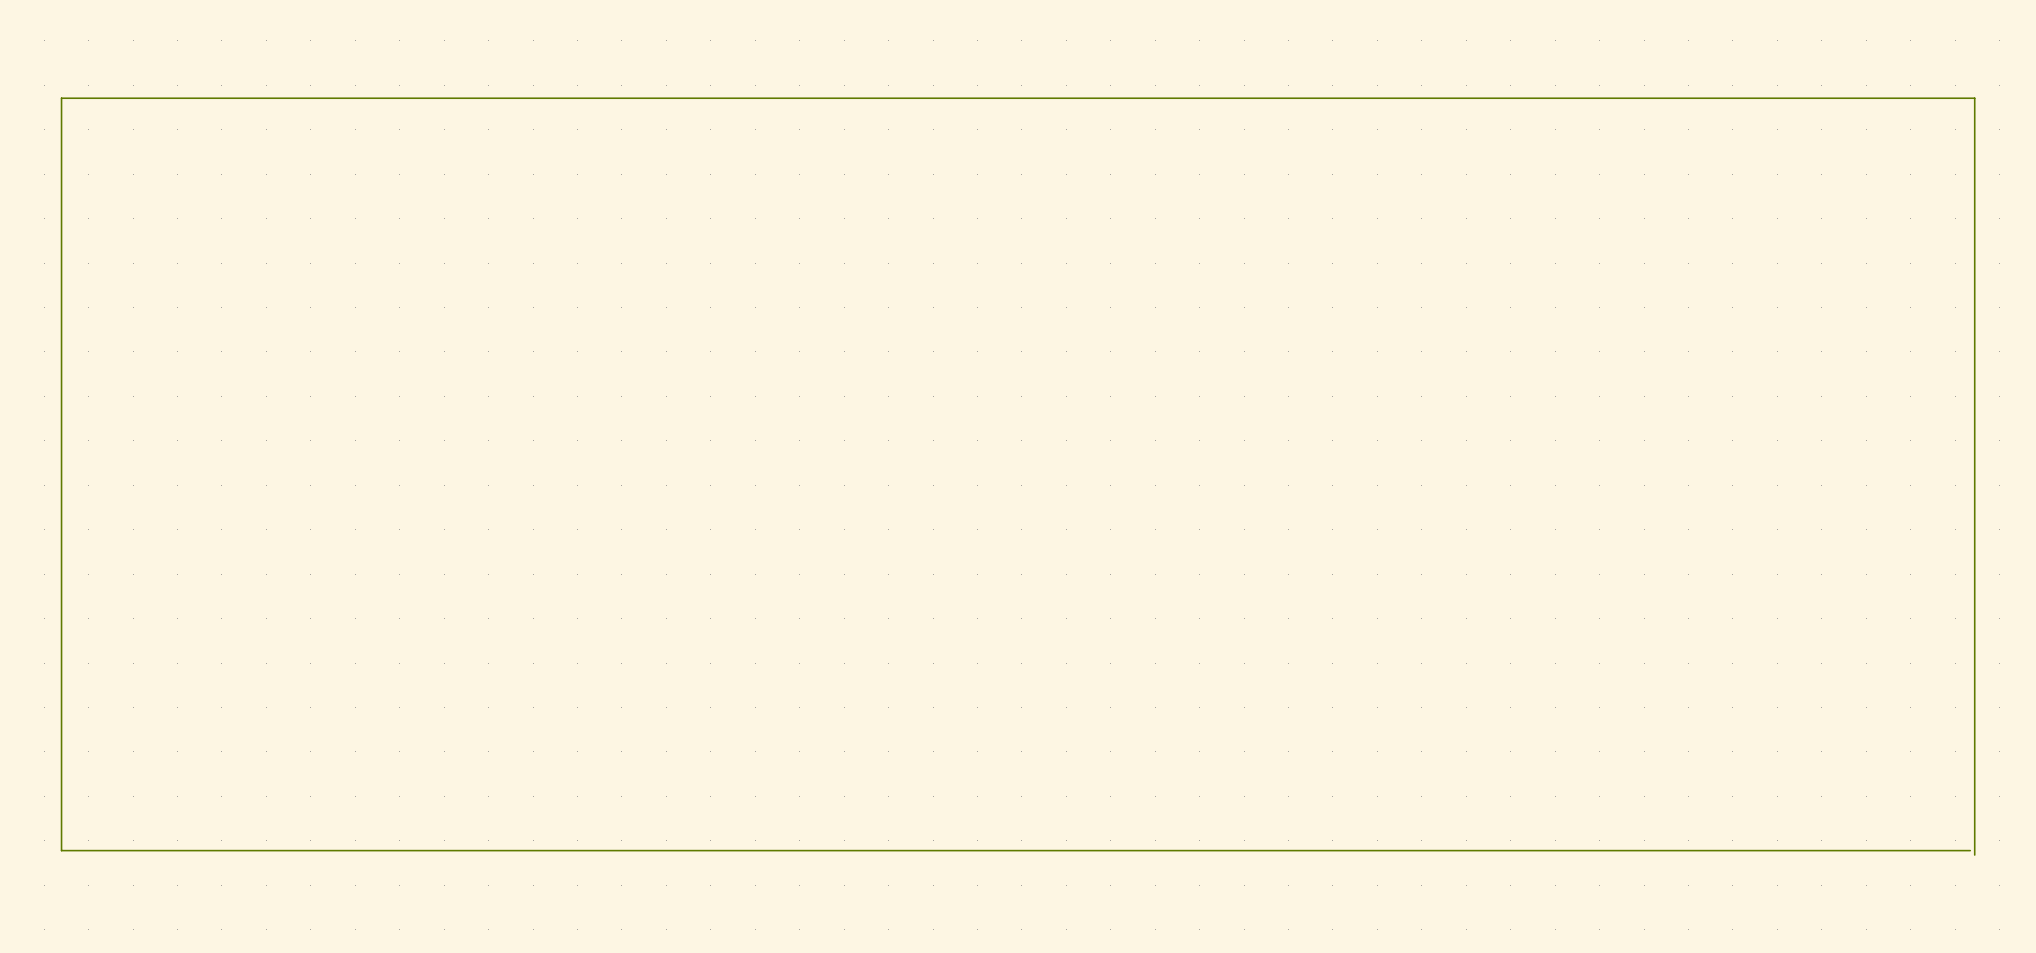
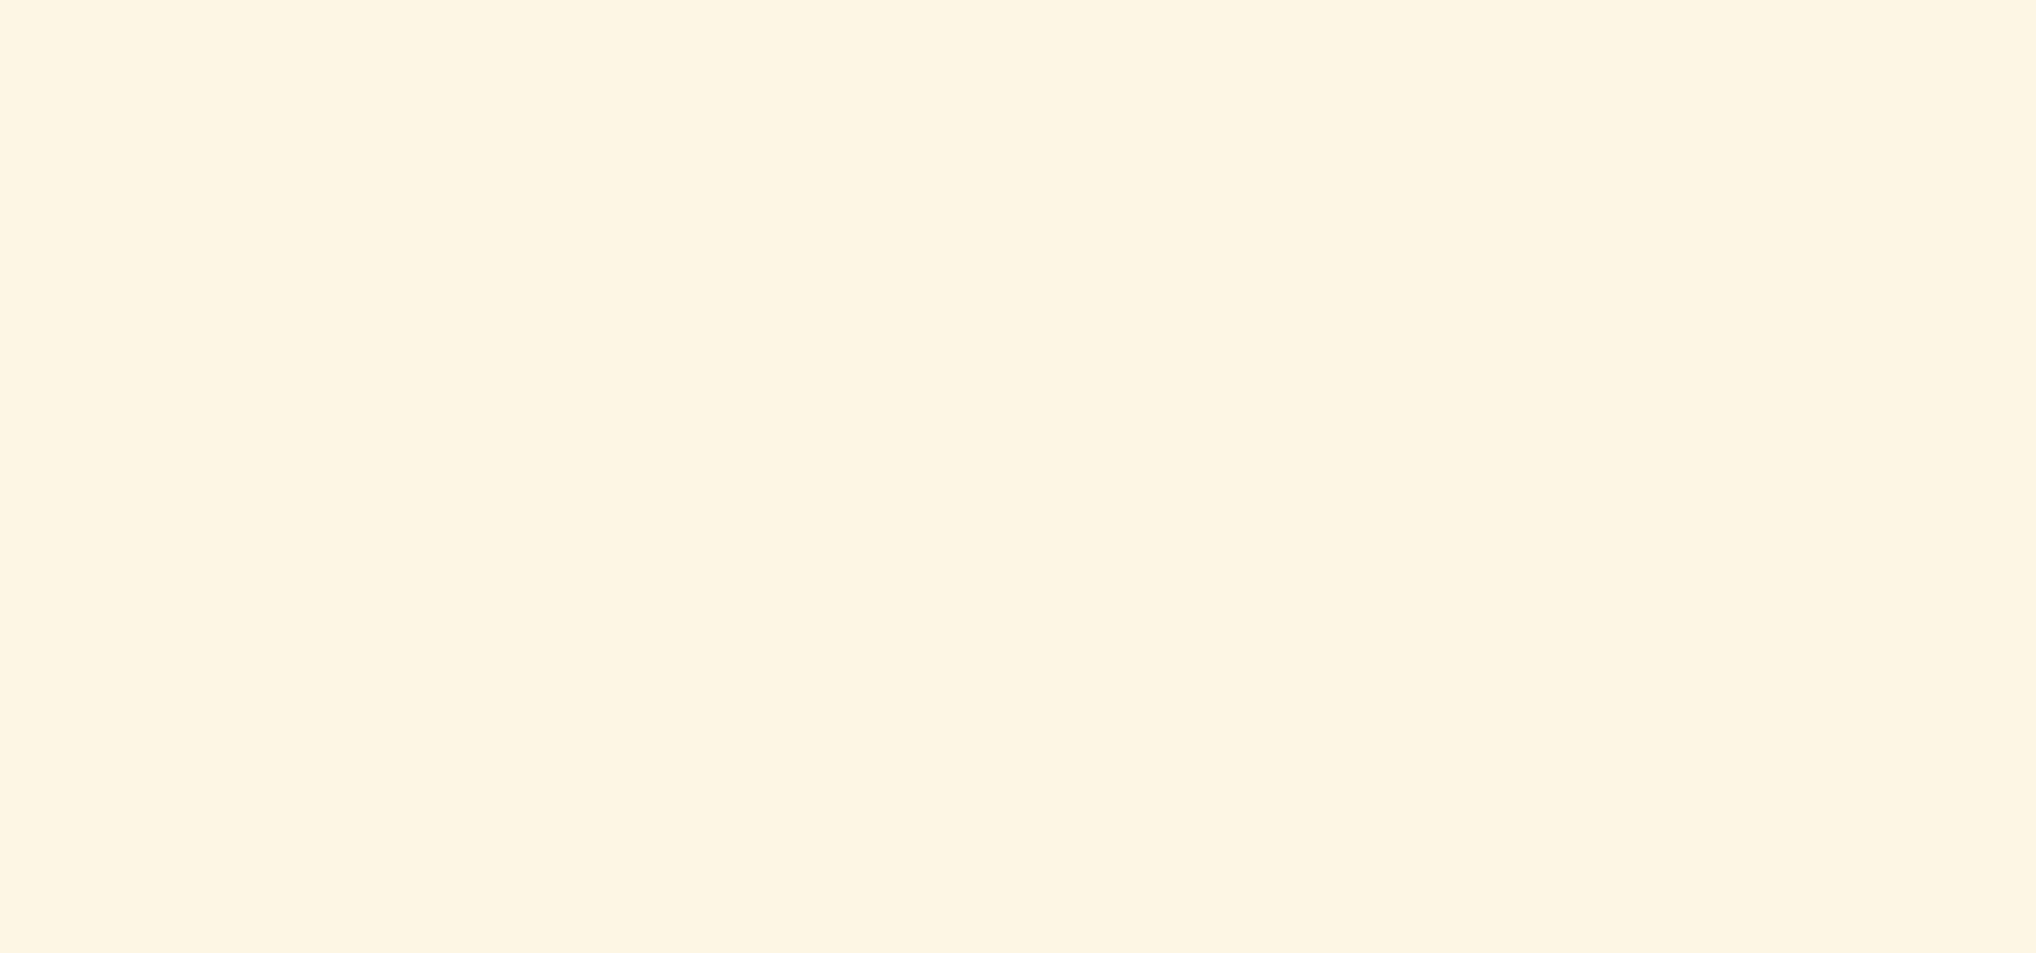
wire: (1970, 850) (61, 850) (61, 98) (1974, 98) (1974, 855) -> none

